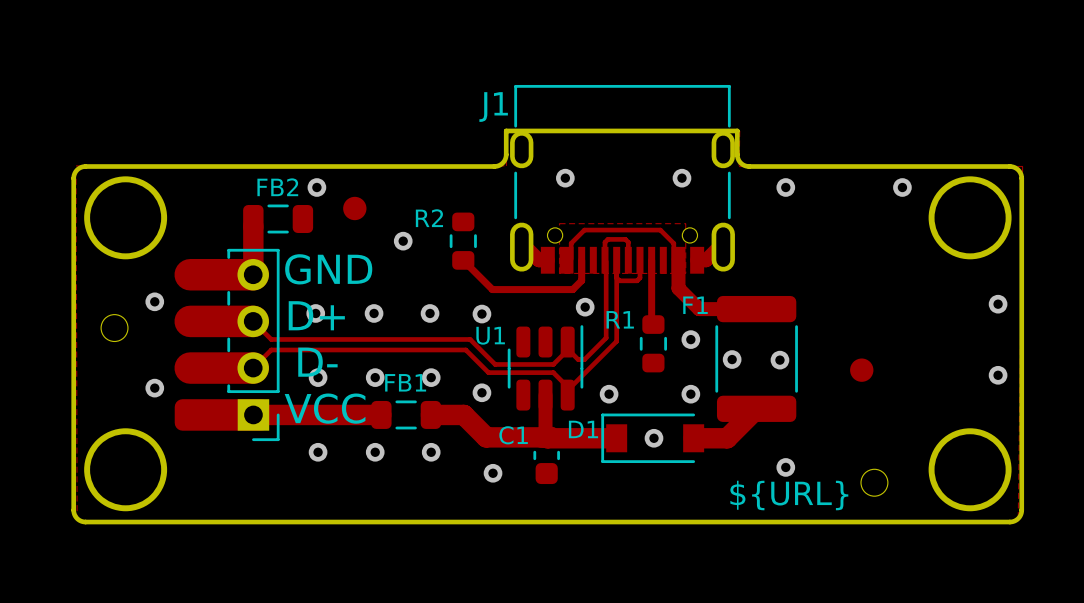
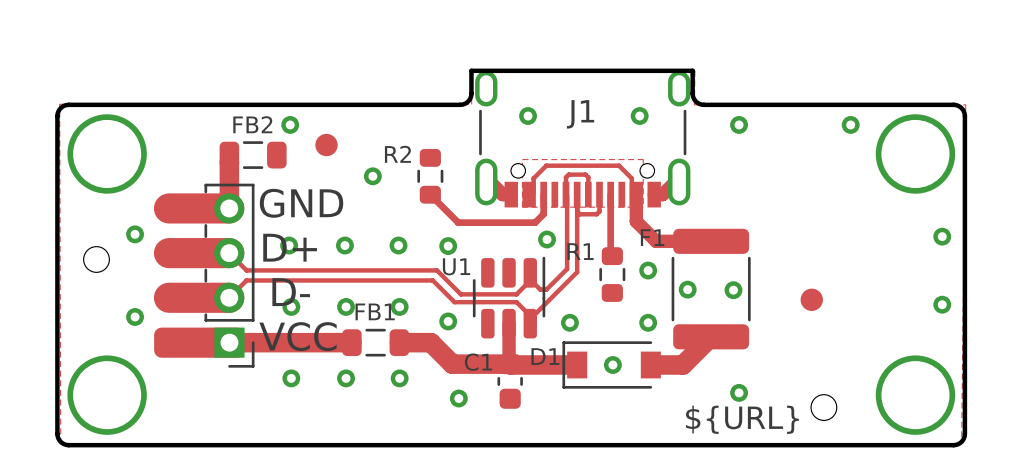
J1 footprint: [510, 84, 735, 274] -> [475, 70, 691, 208]
J1 name position: J1 (493, 107) -> J1 (580, 114)

